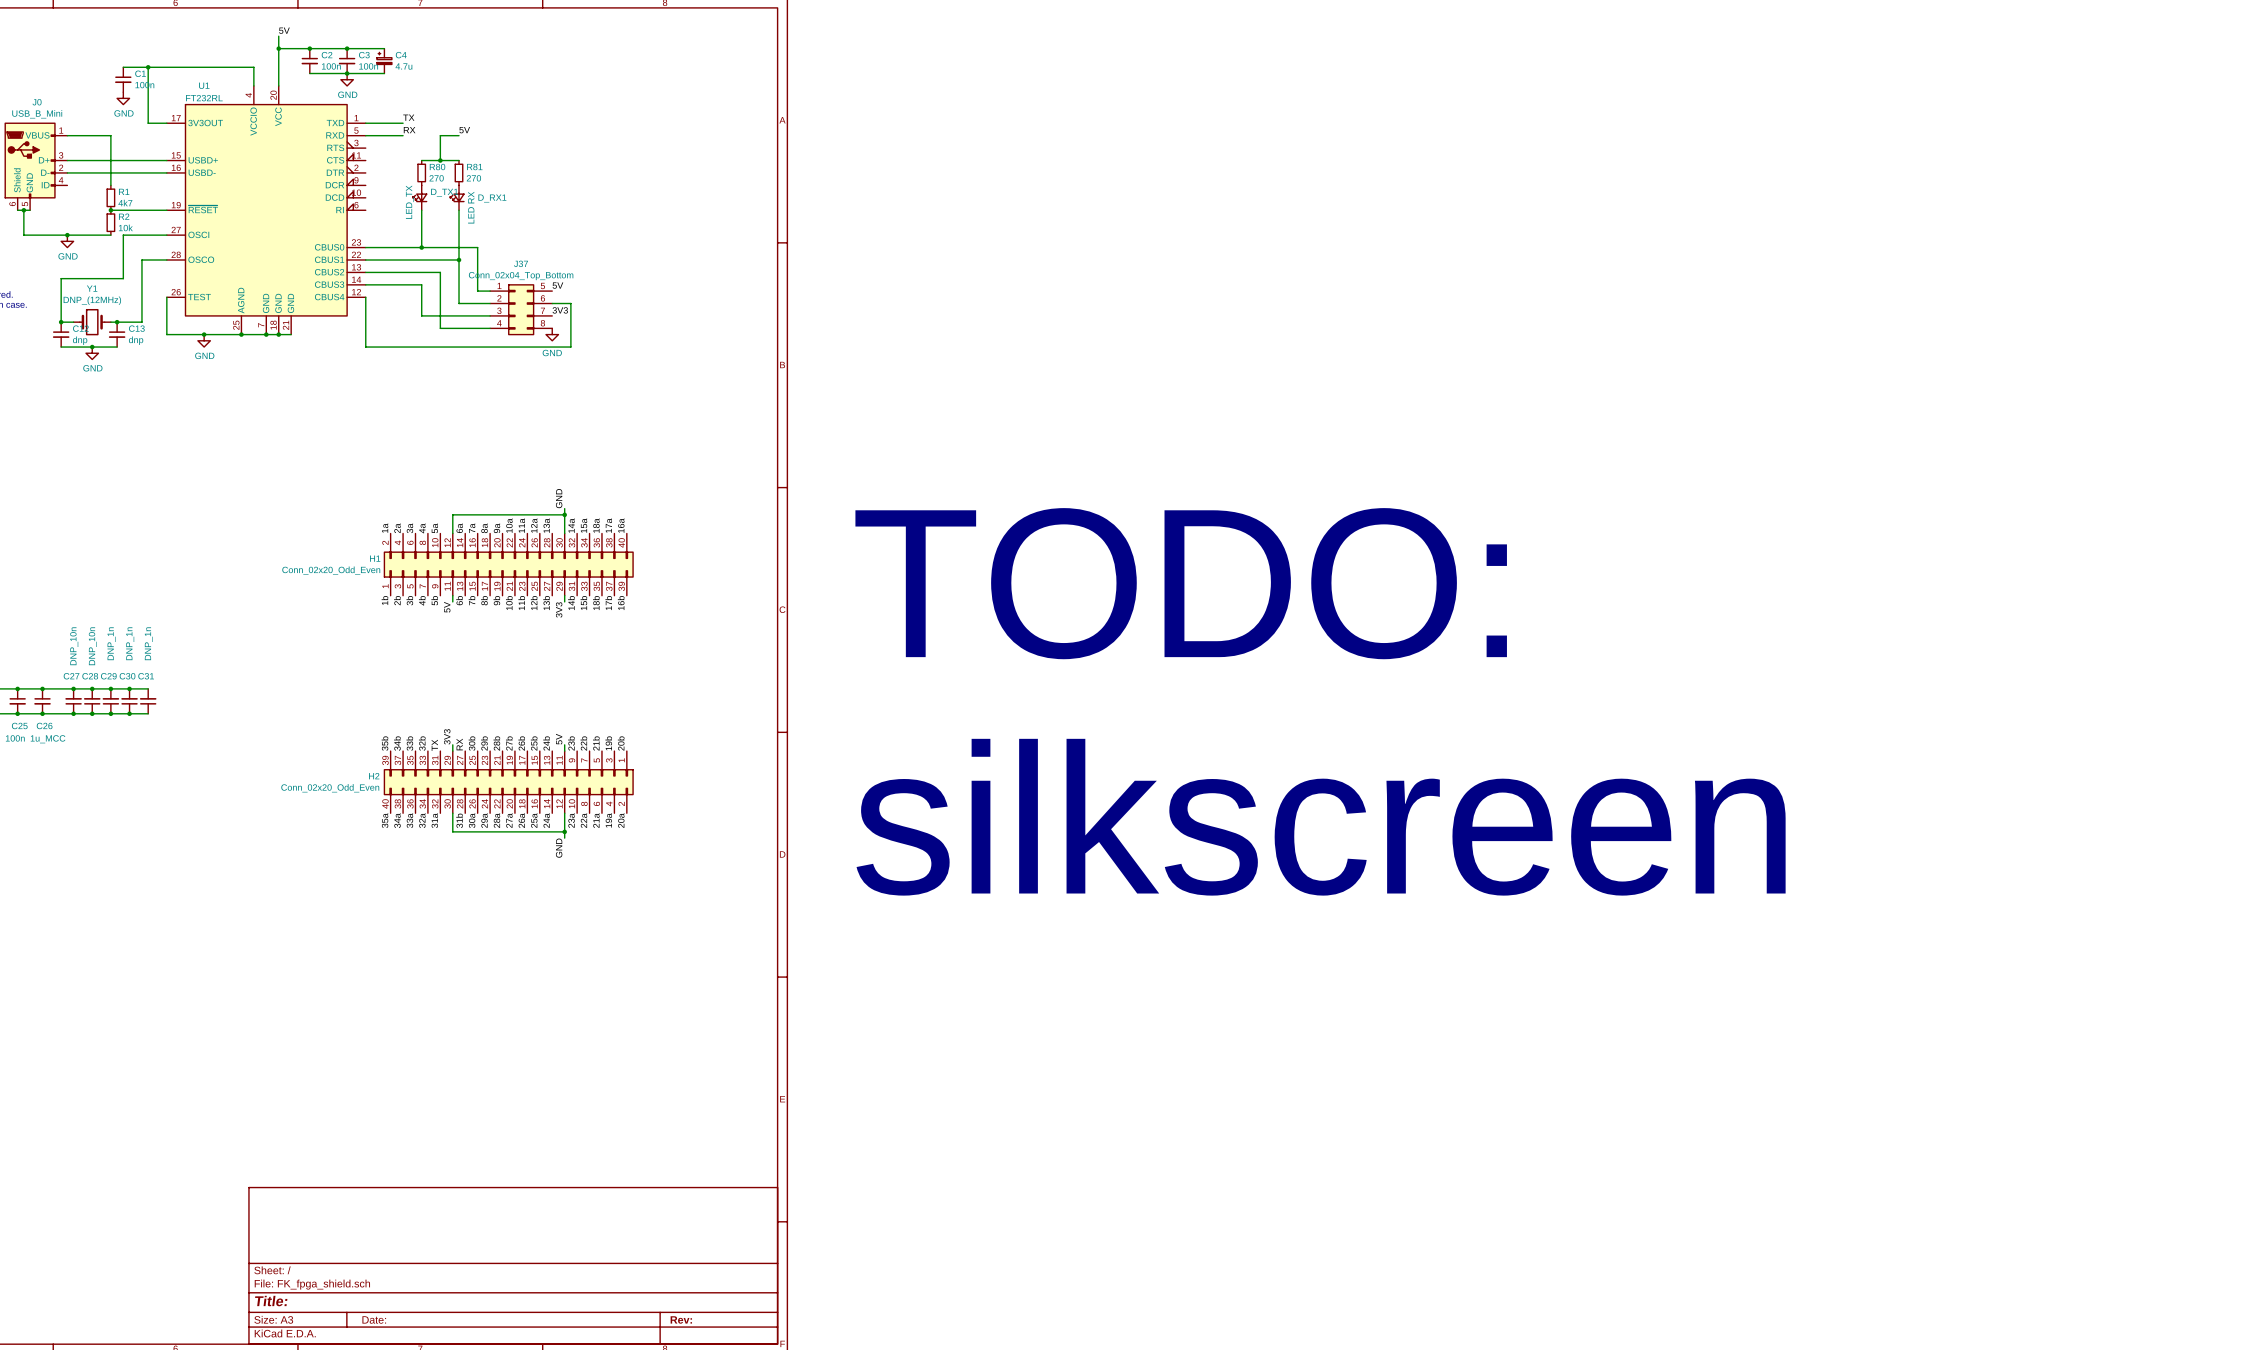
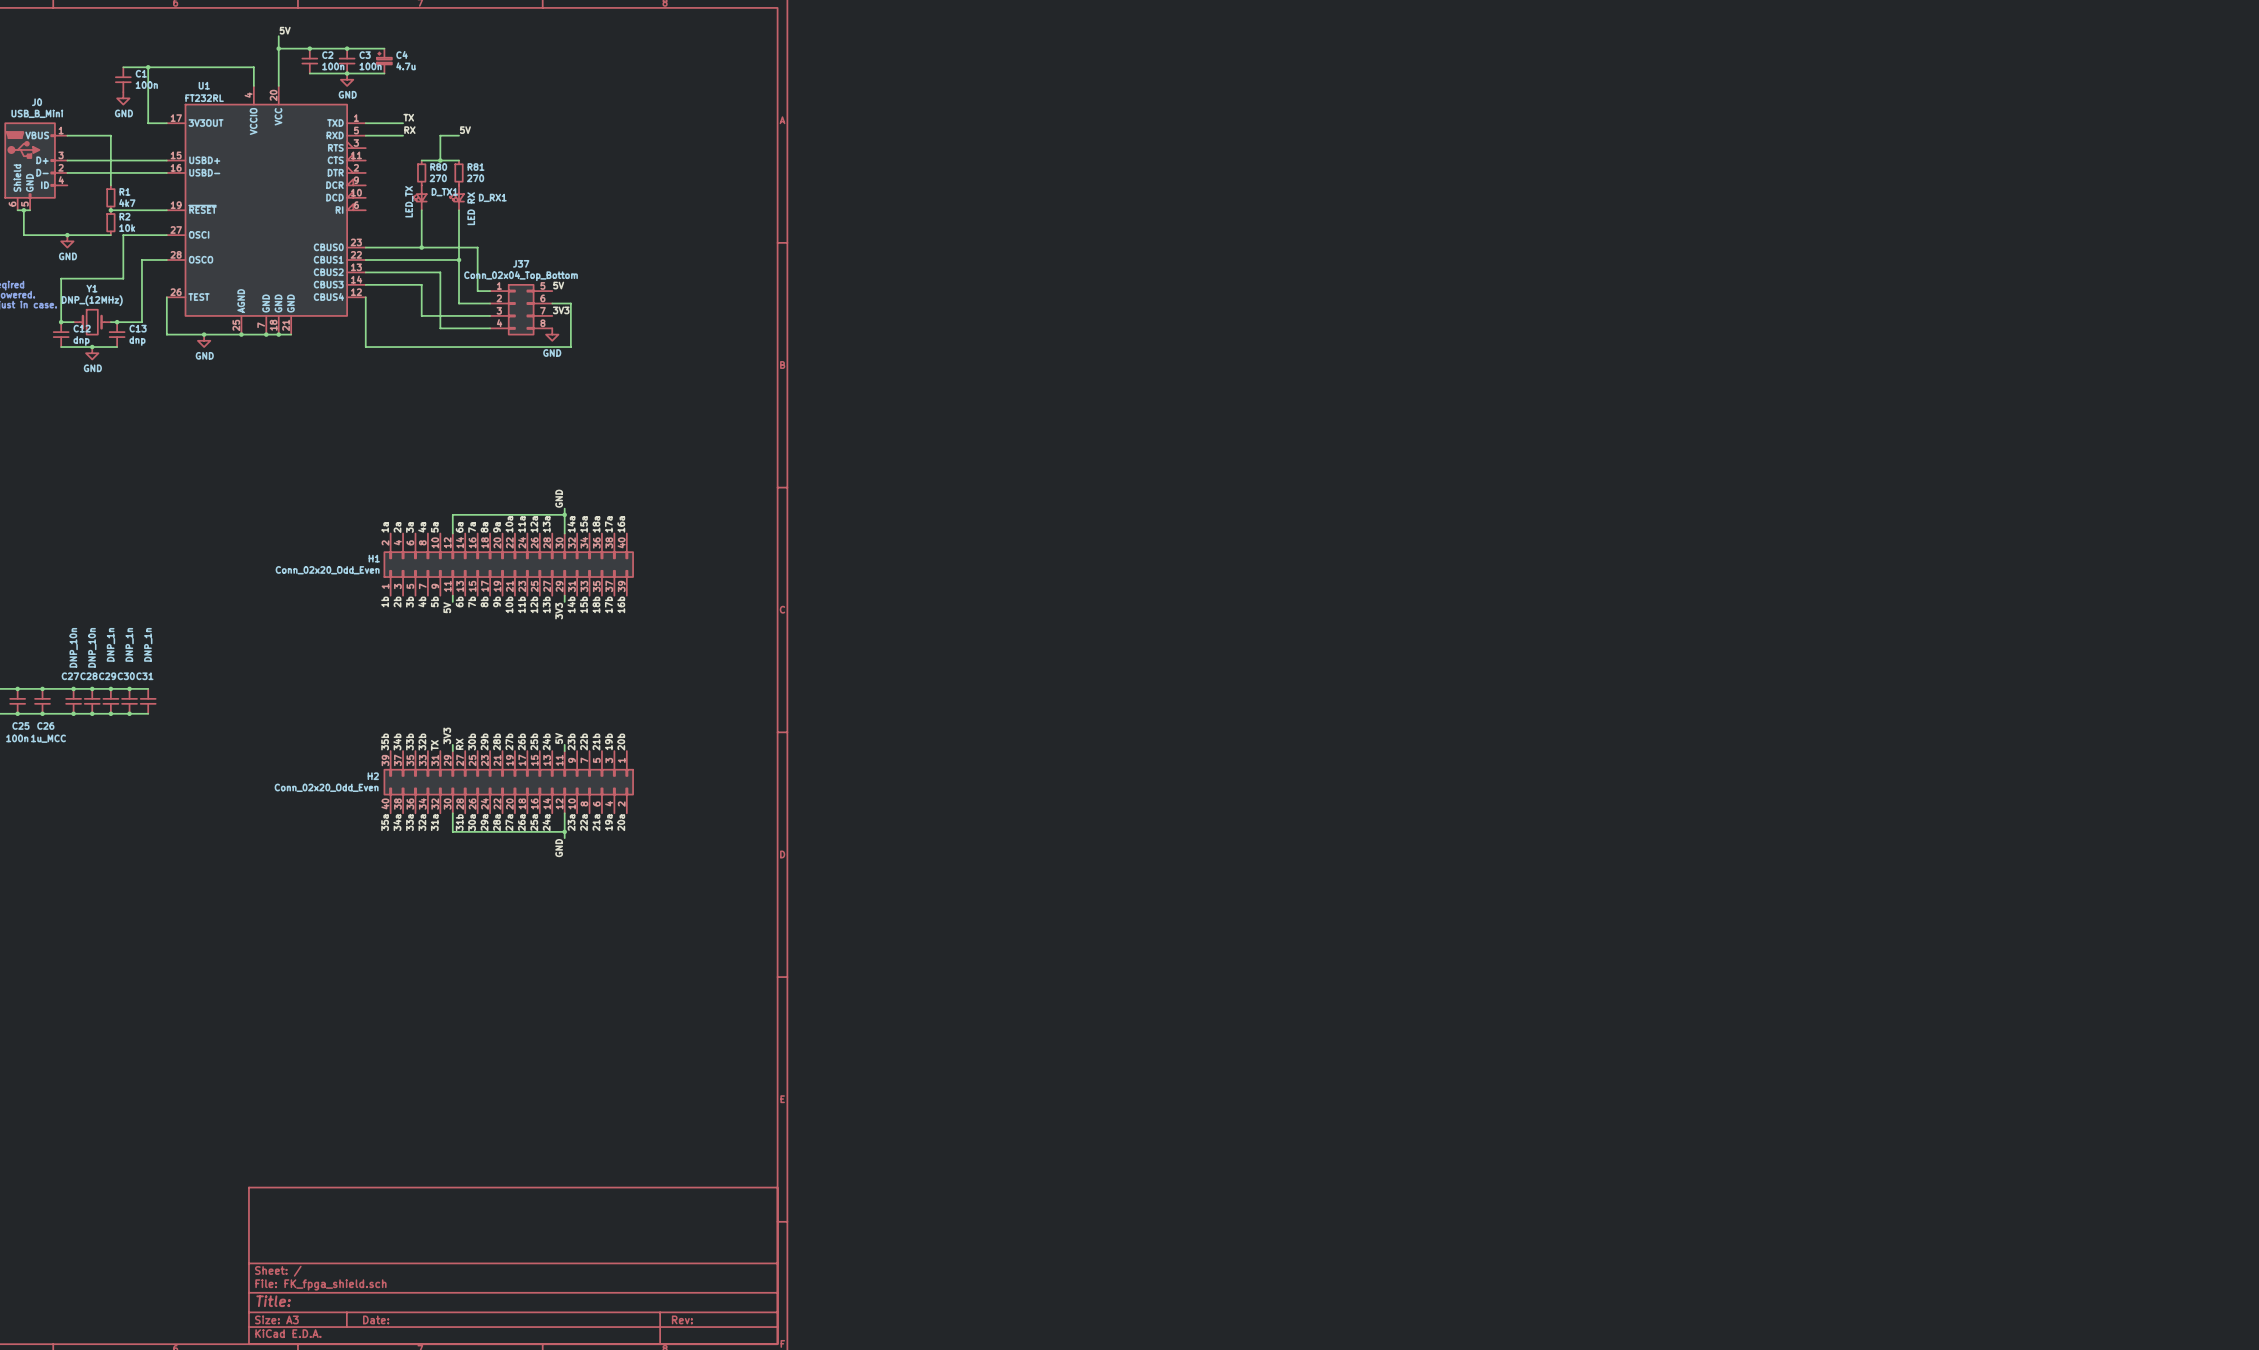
text: TODO: (1181, 583) -> none
text: silkscreen (1321, 817) -> none

